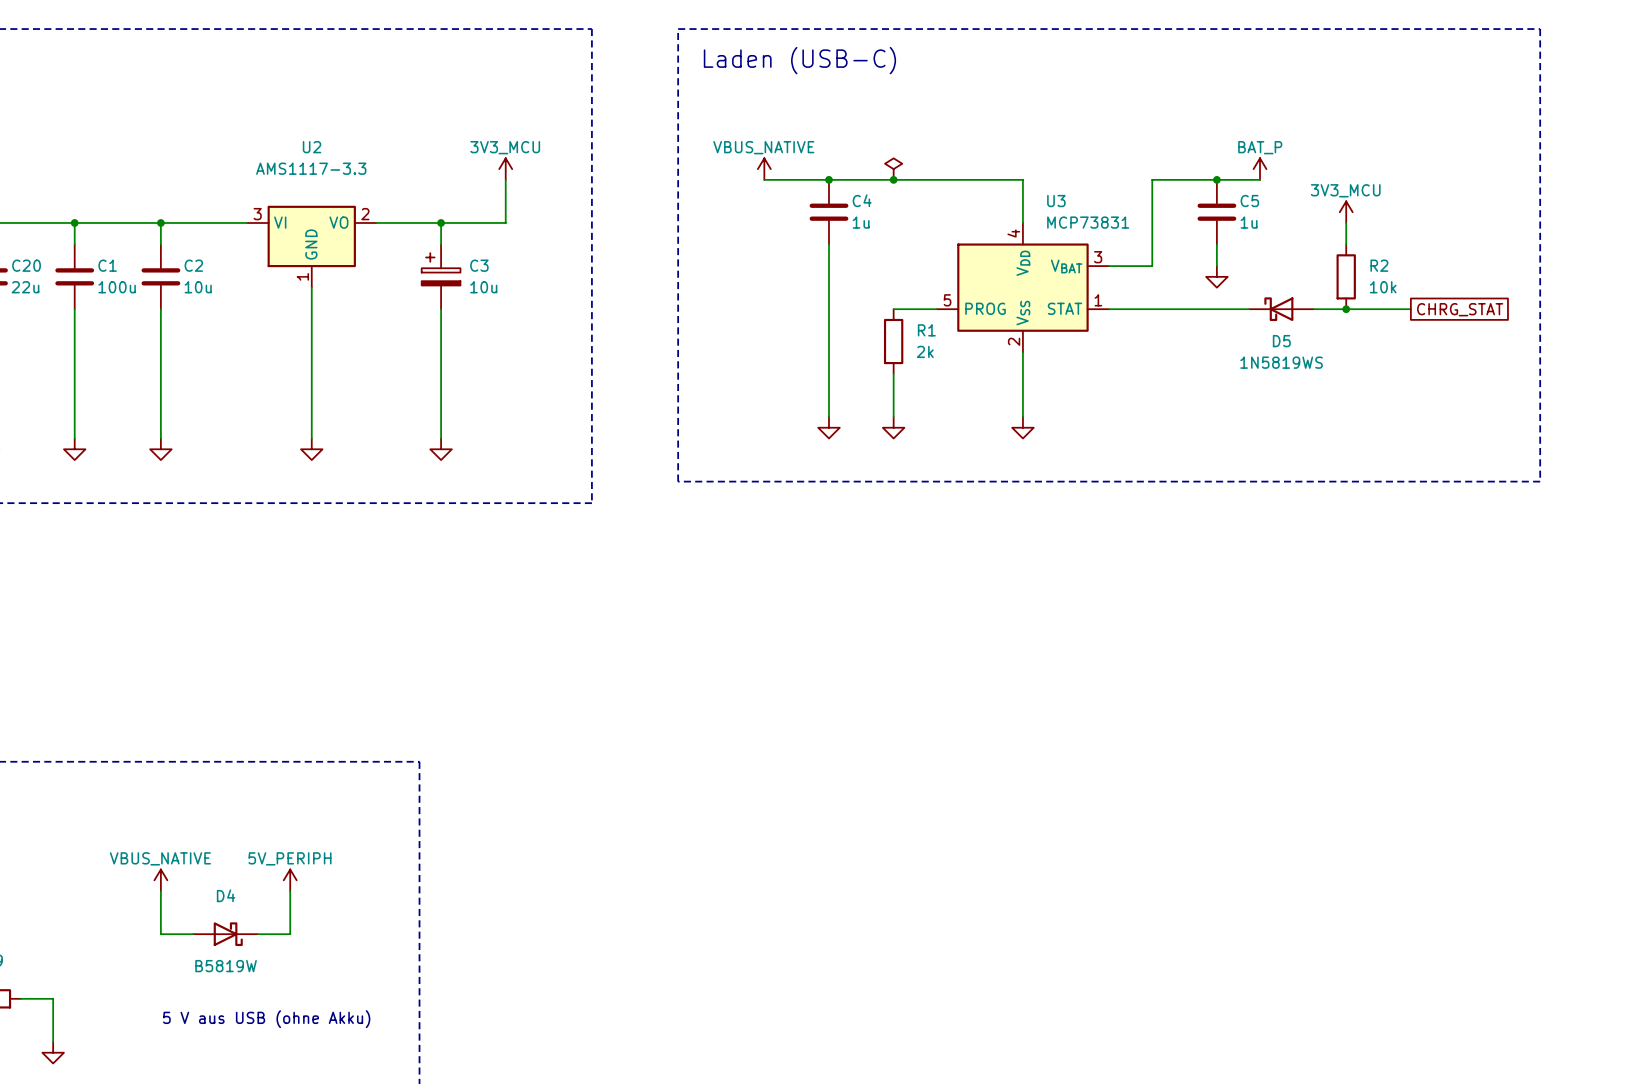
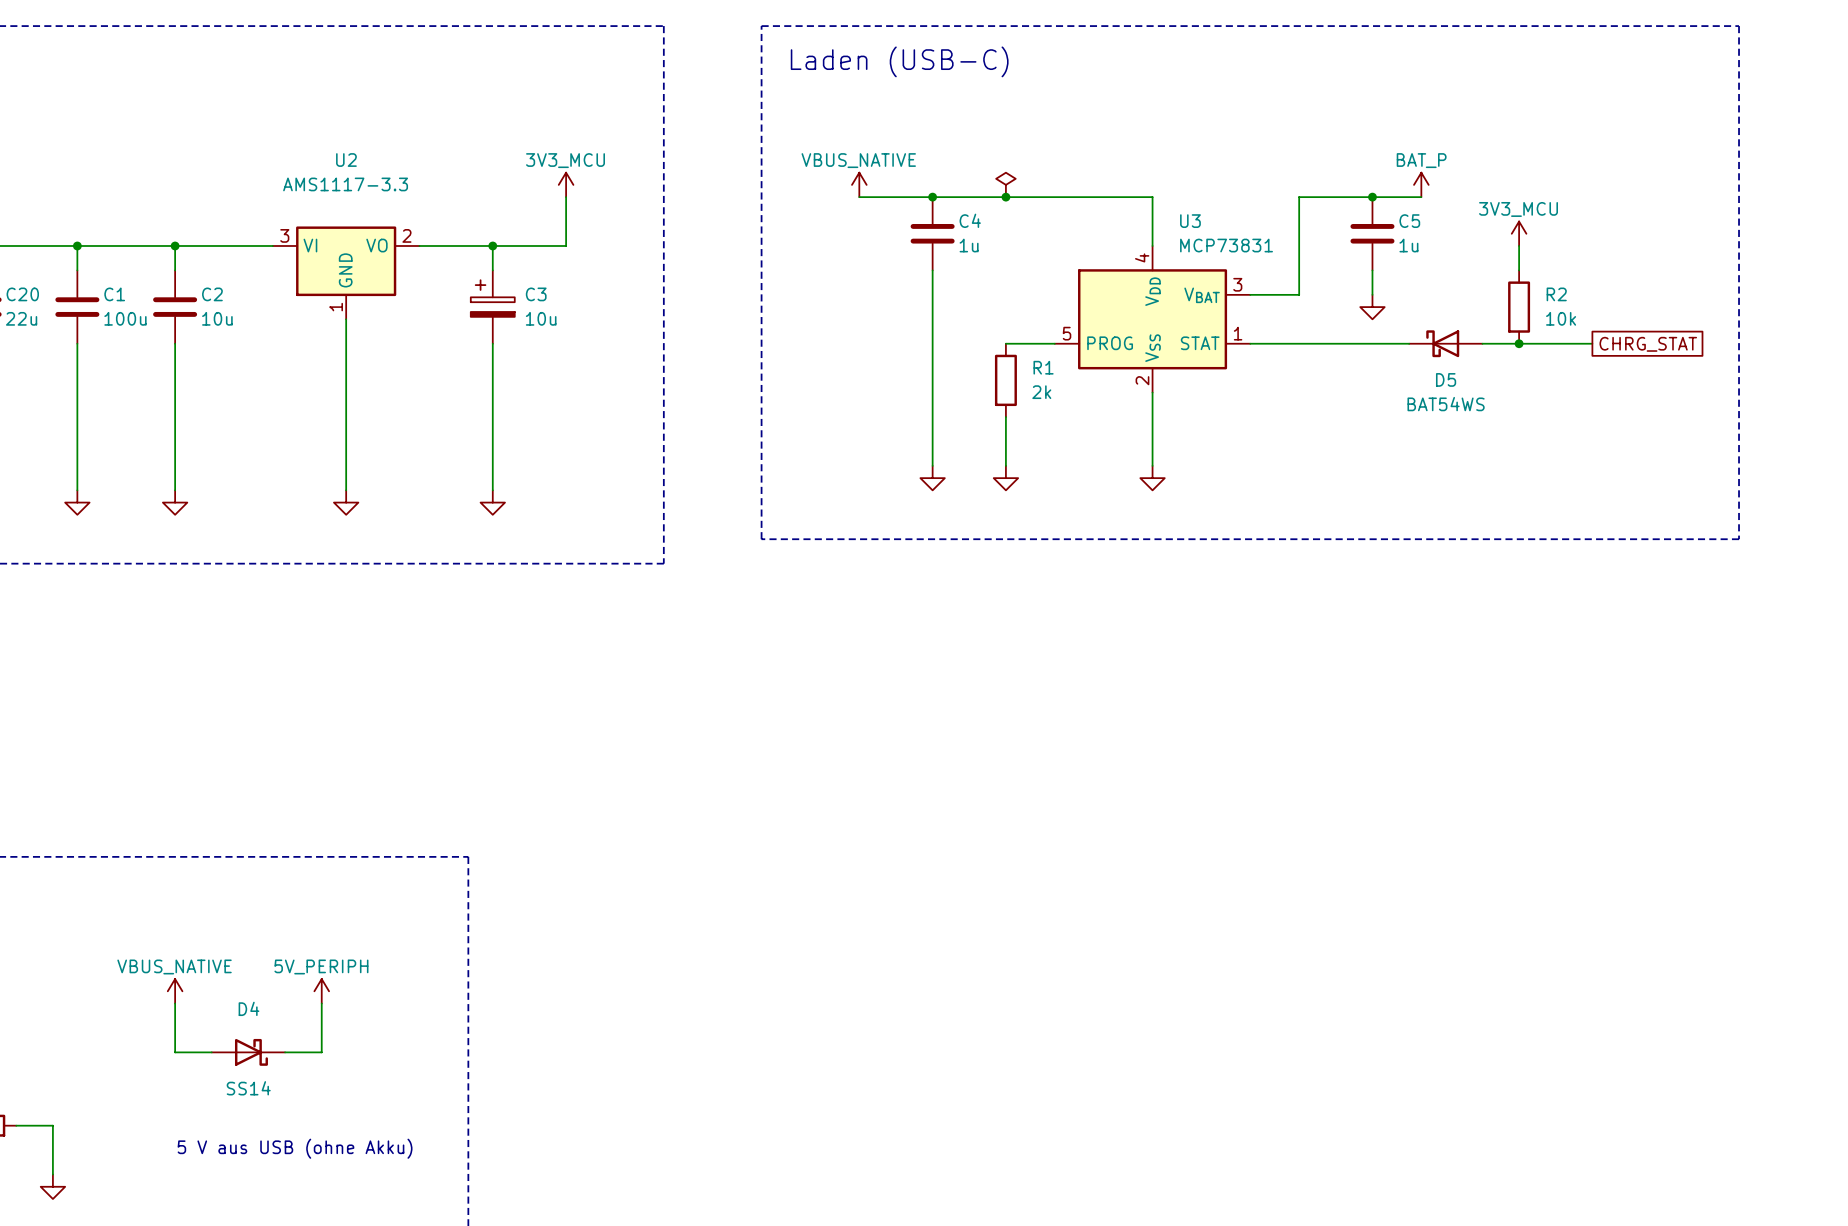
D5 value: 1N5819WS (1281, 362) -> BAT54WS (1446, 404)
D4 value: B5819W (226, 966) -> SS14 (248, 1088)

